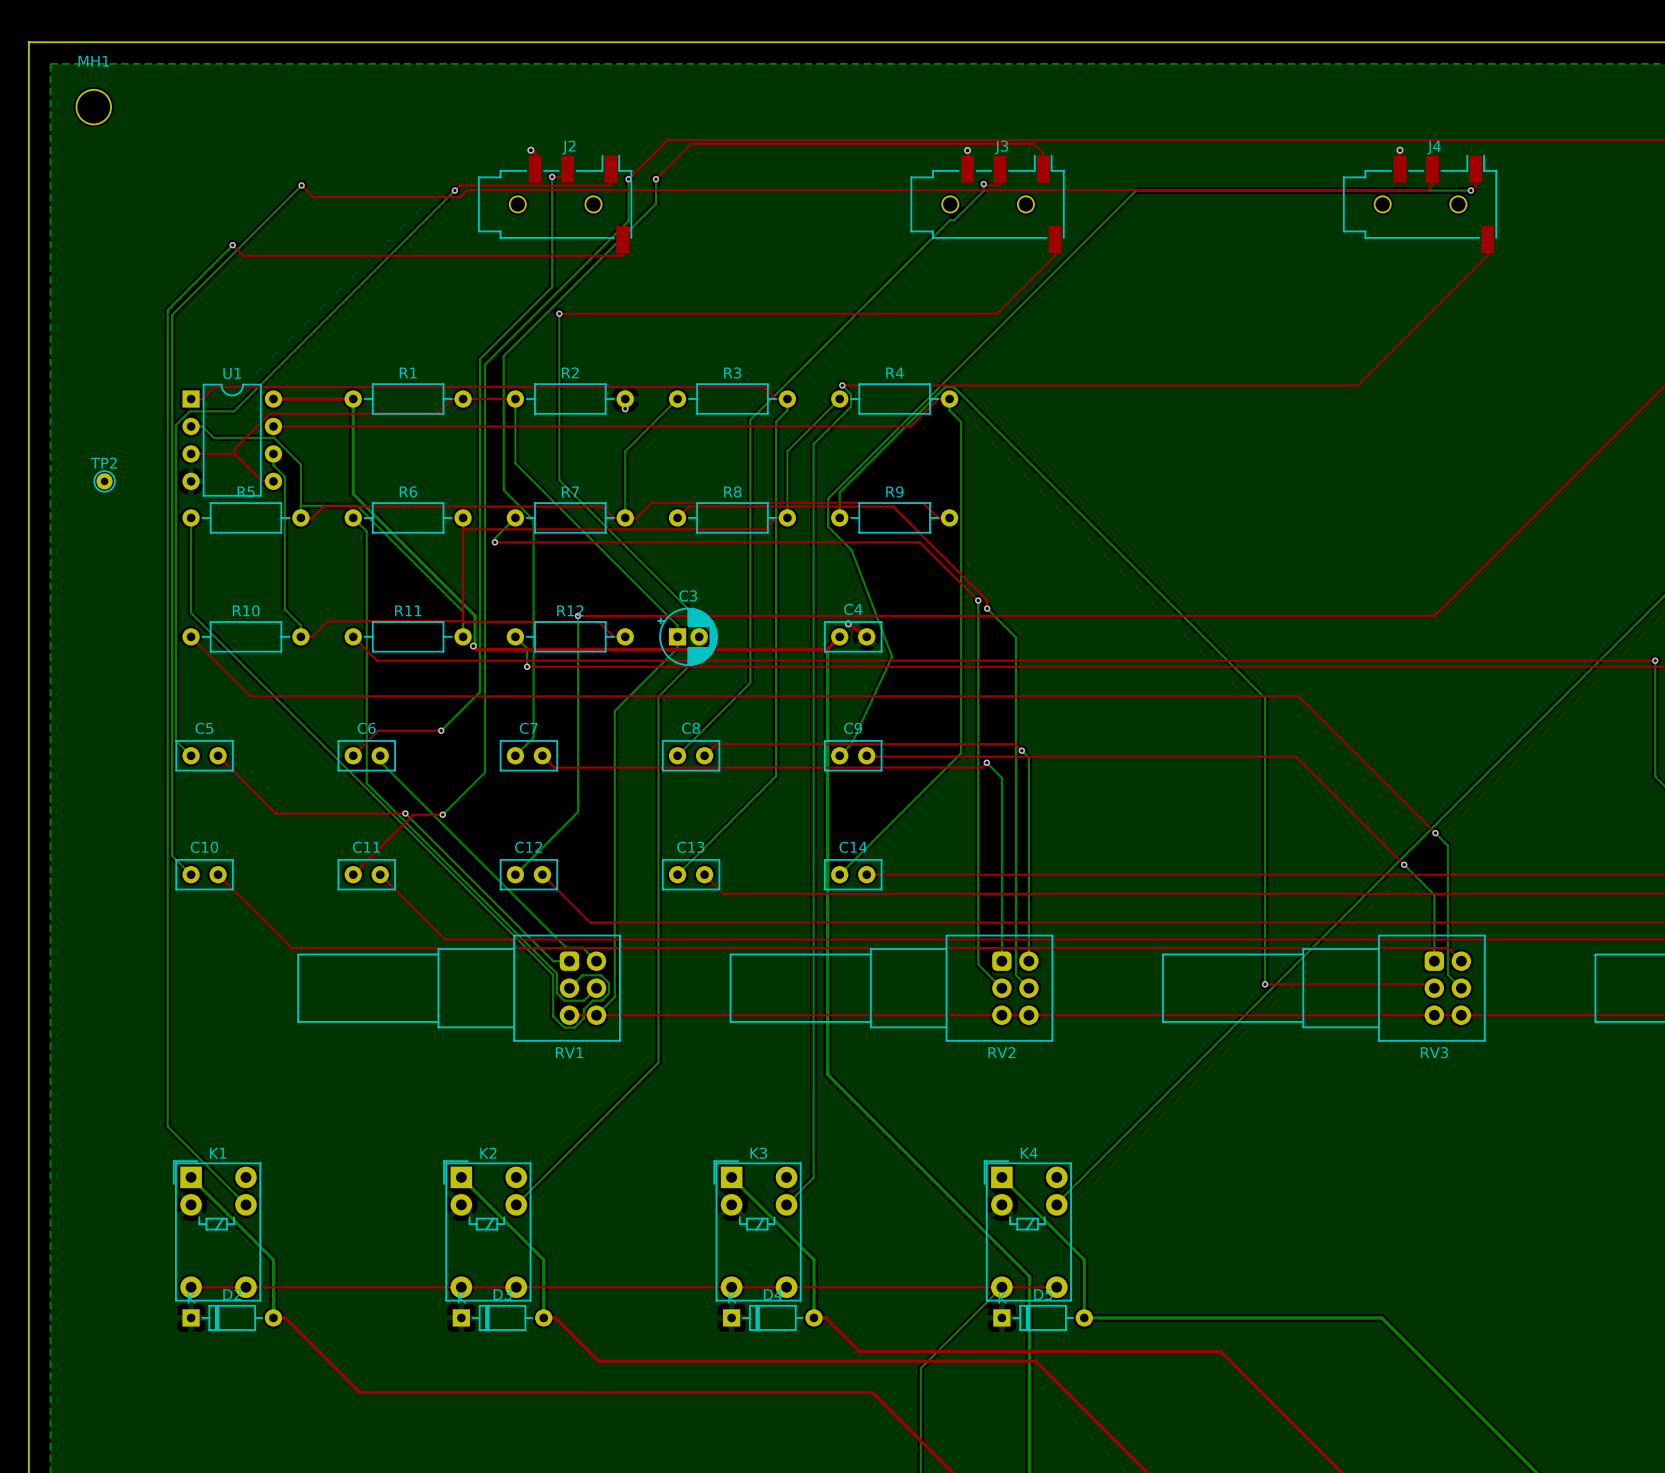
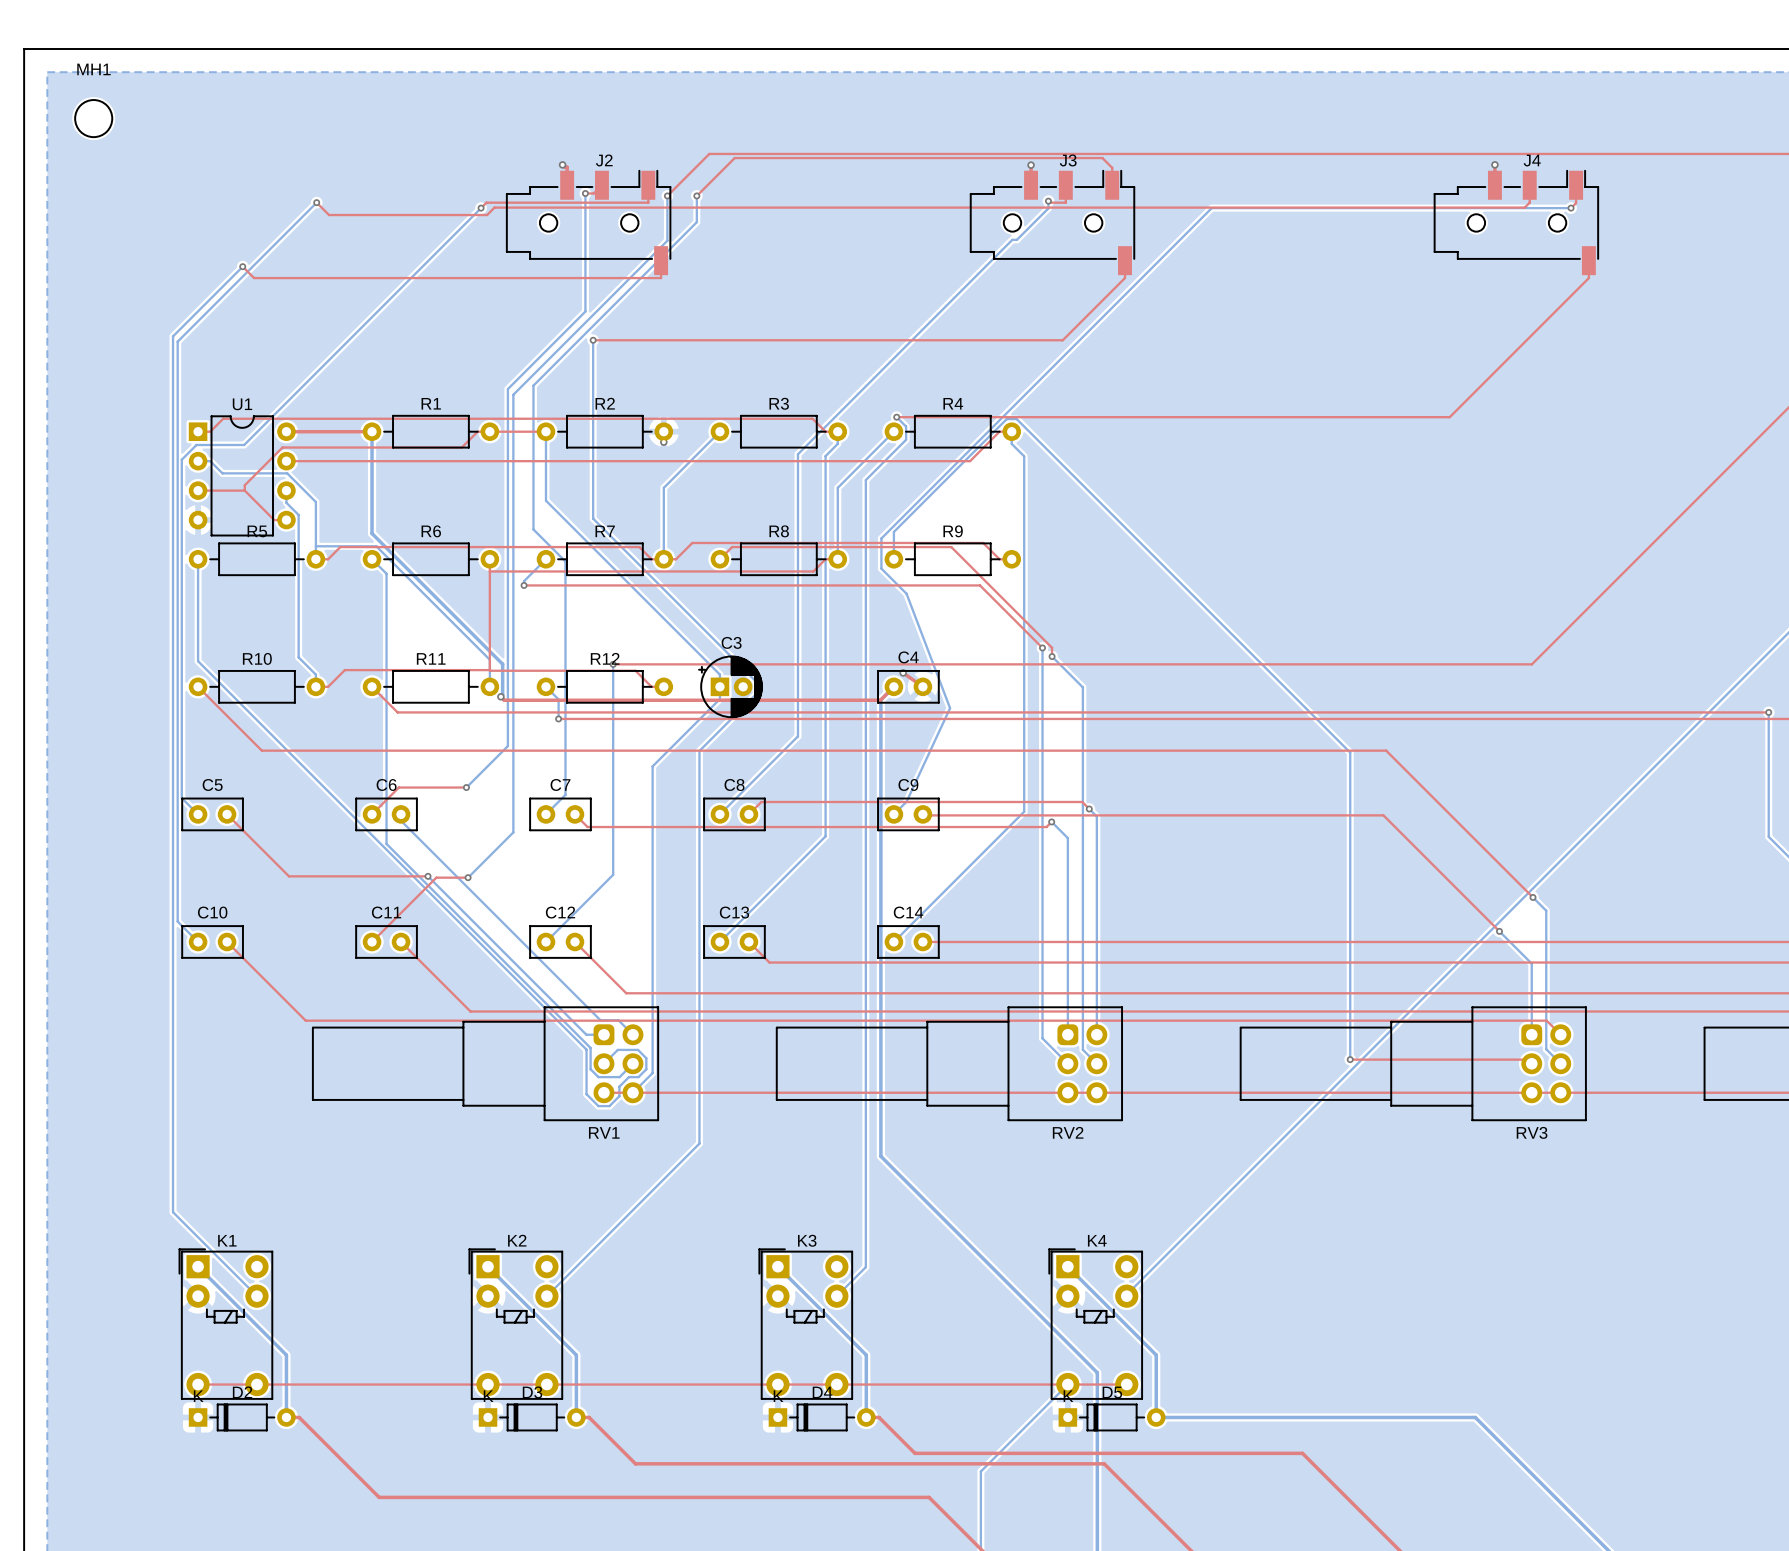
TP2: (104, 481) -> none

